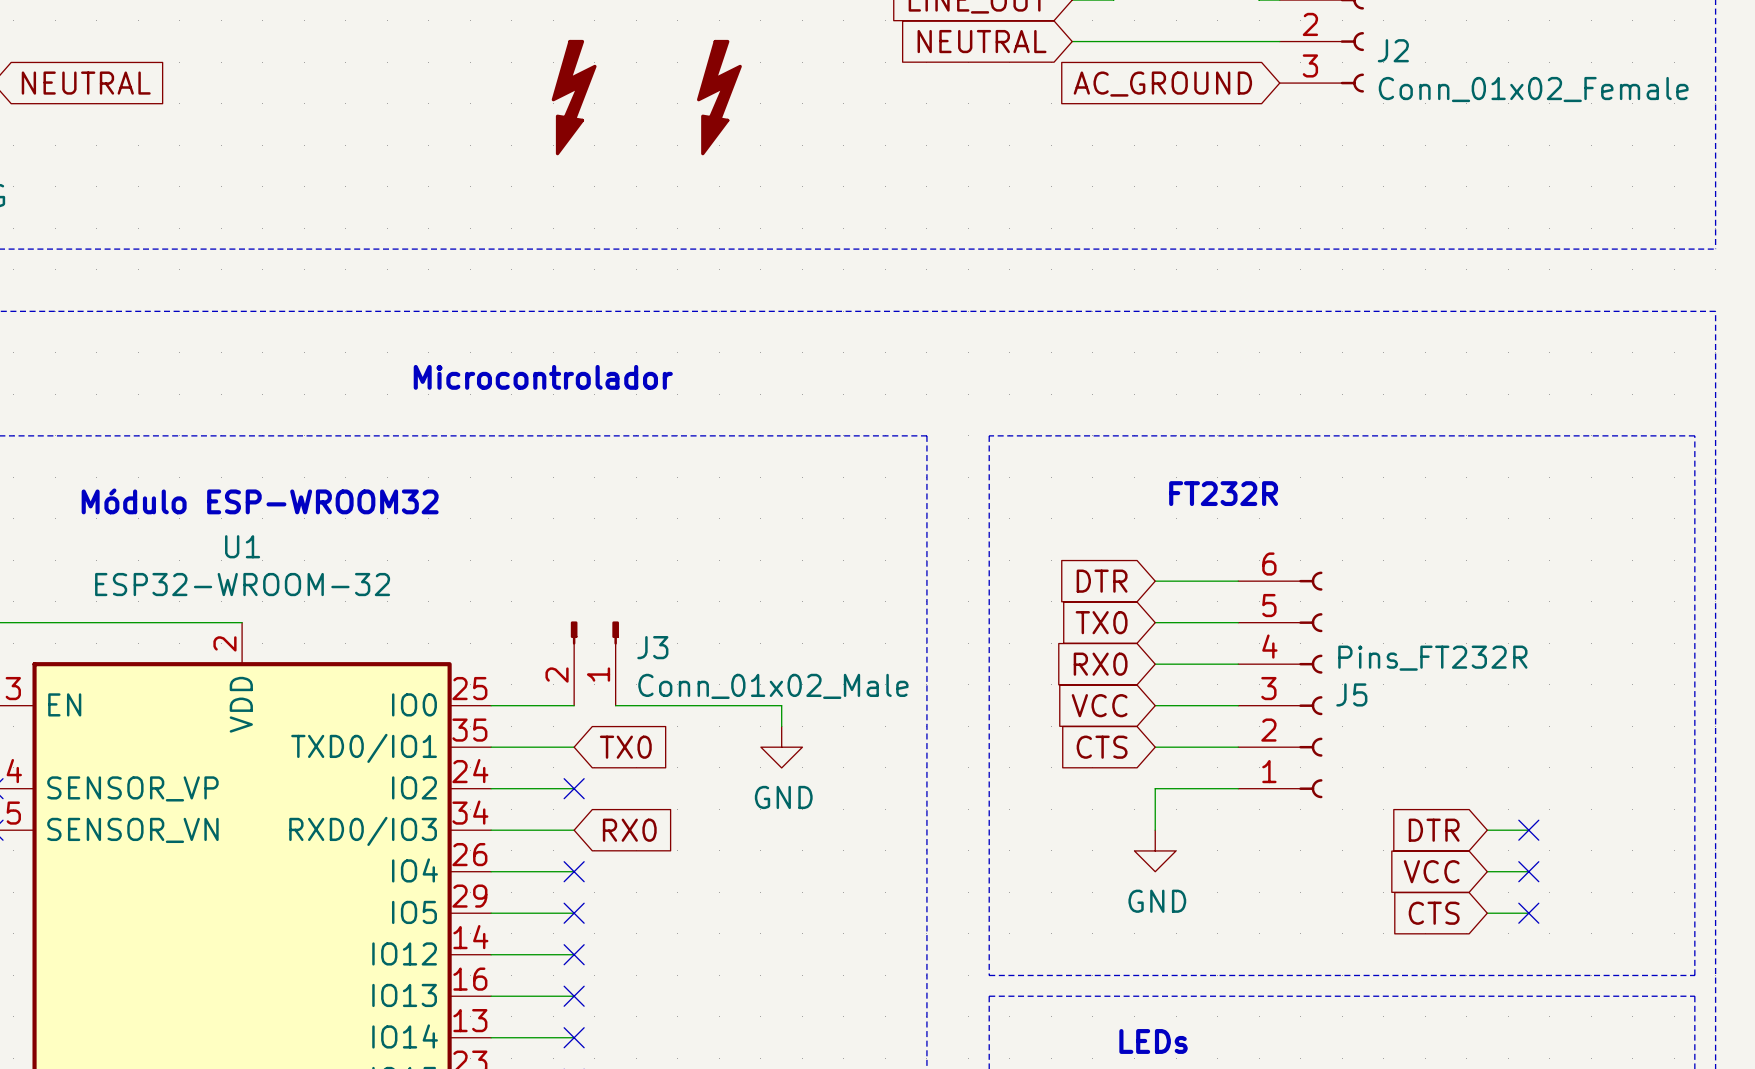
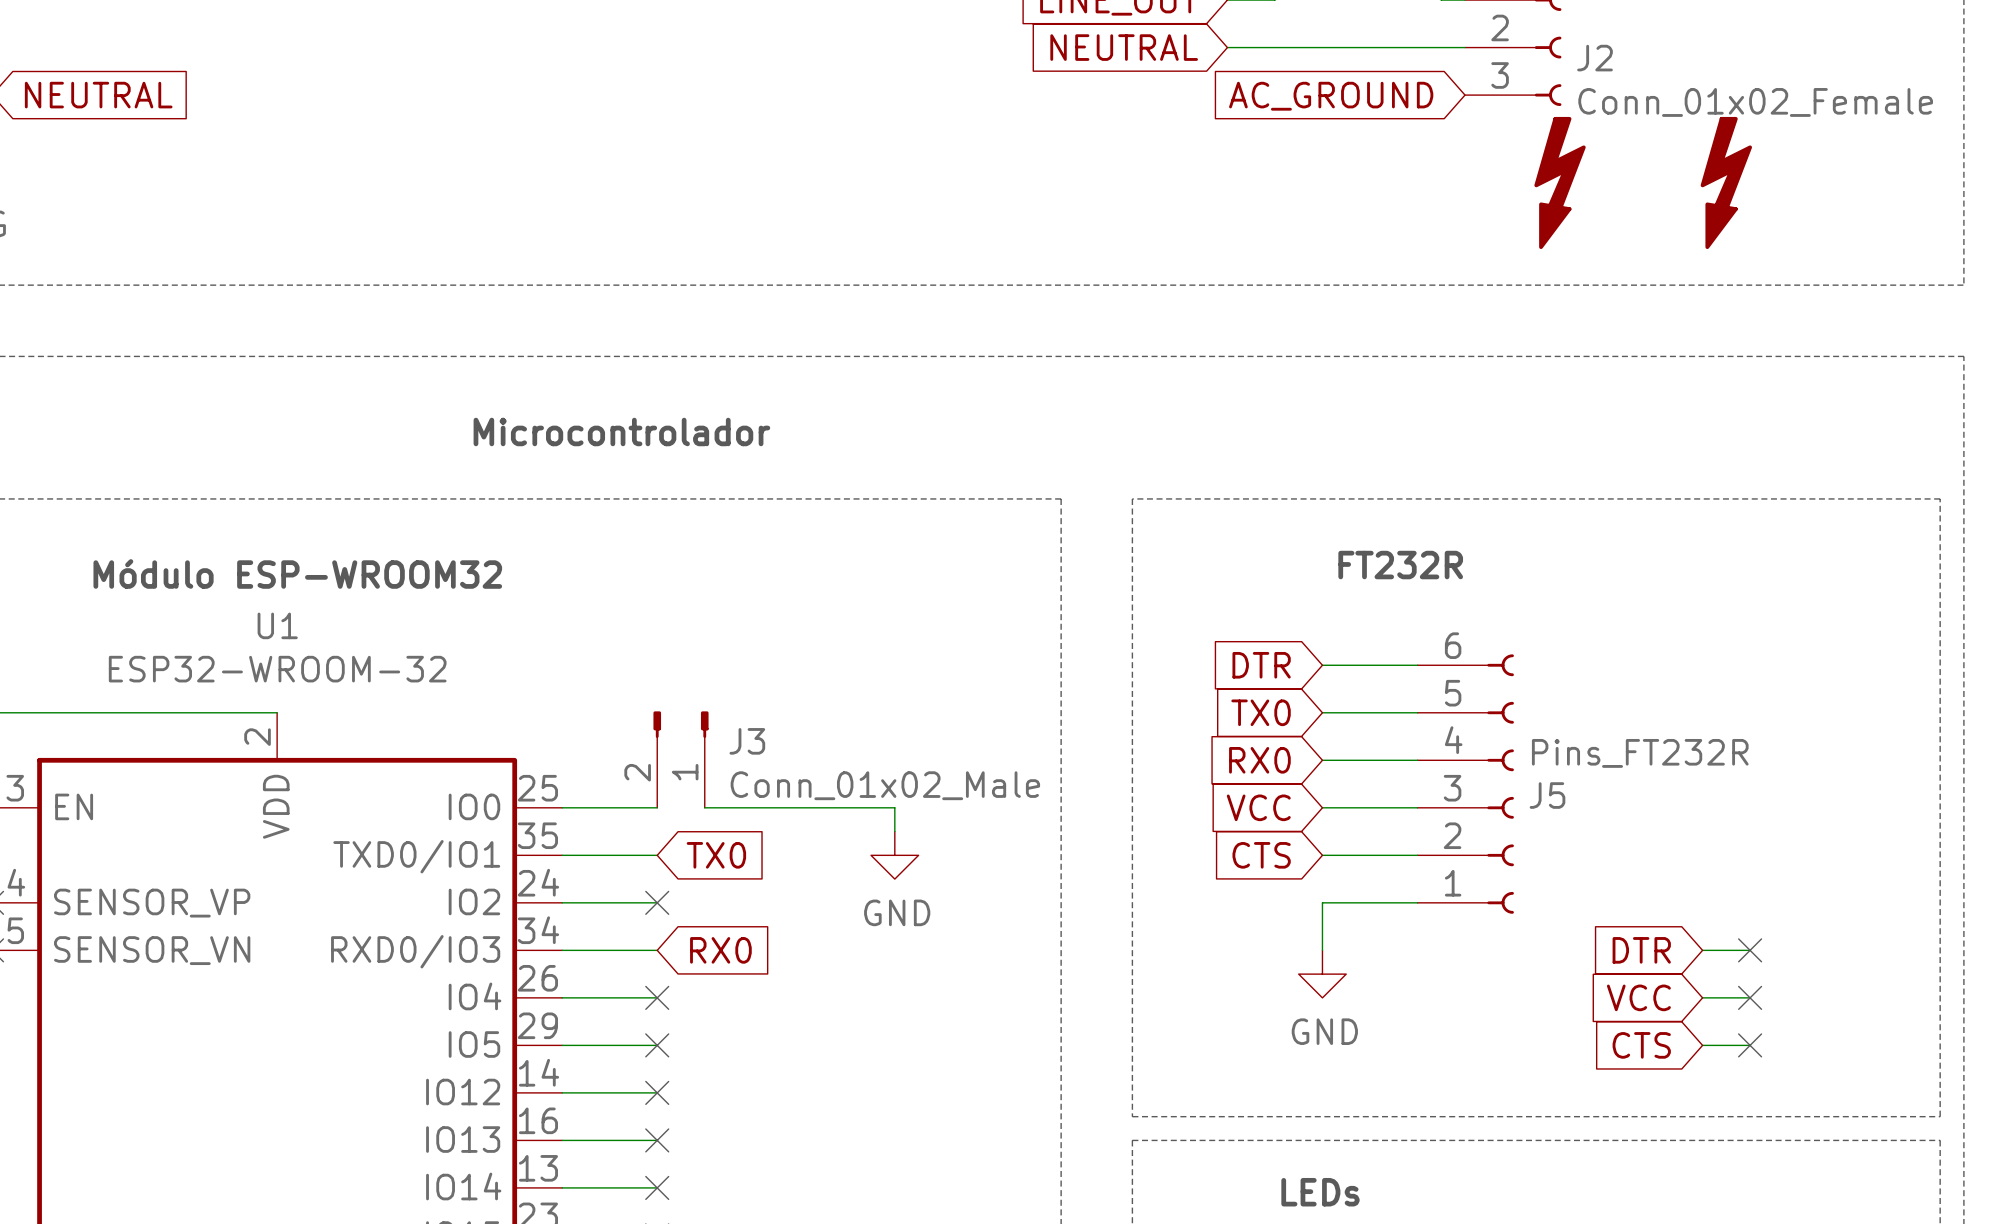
part: (574, 97) -> none
part: (719, 97) -> none
part: none -> (1560, 182)
part: none -> (1726, 182)

